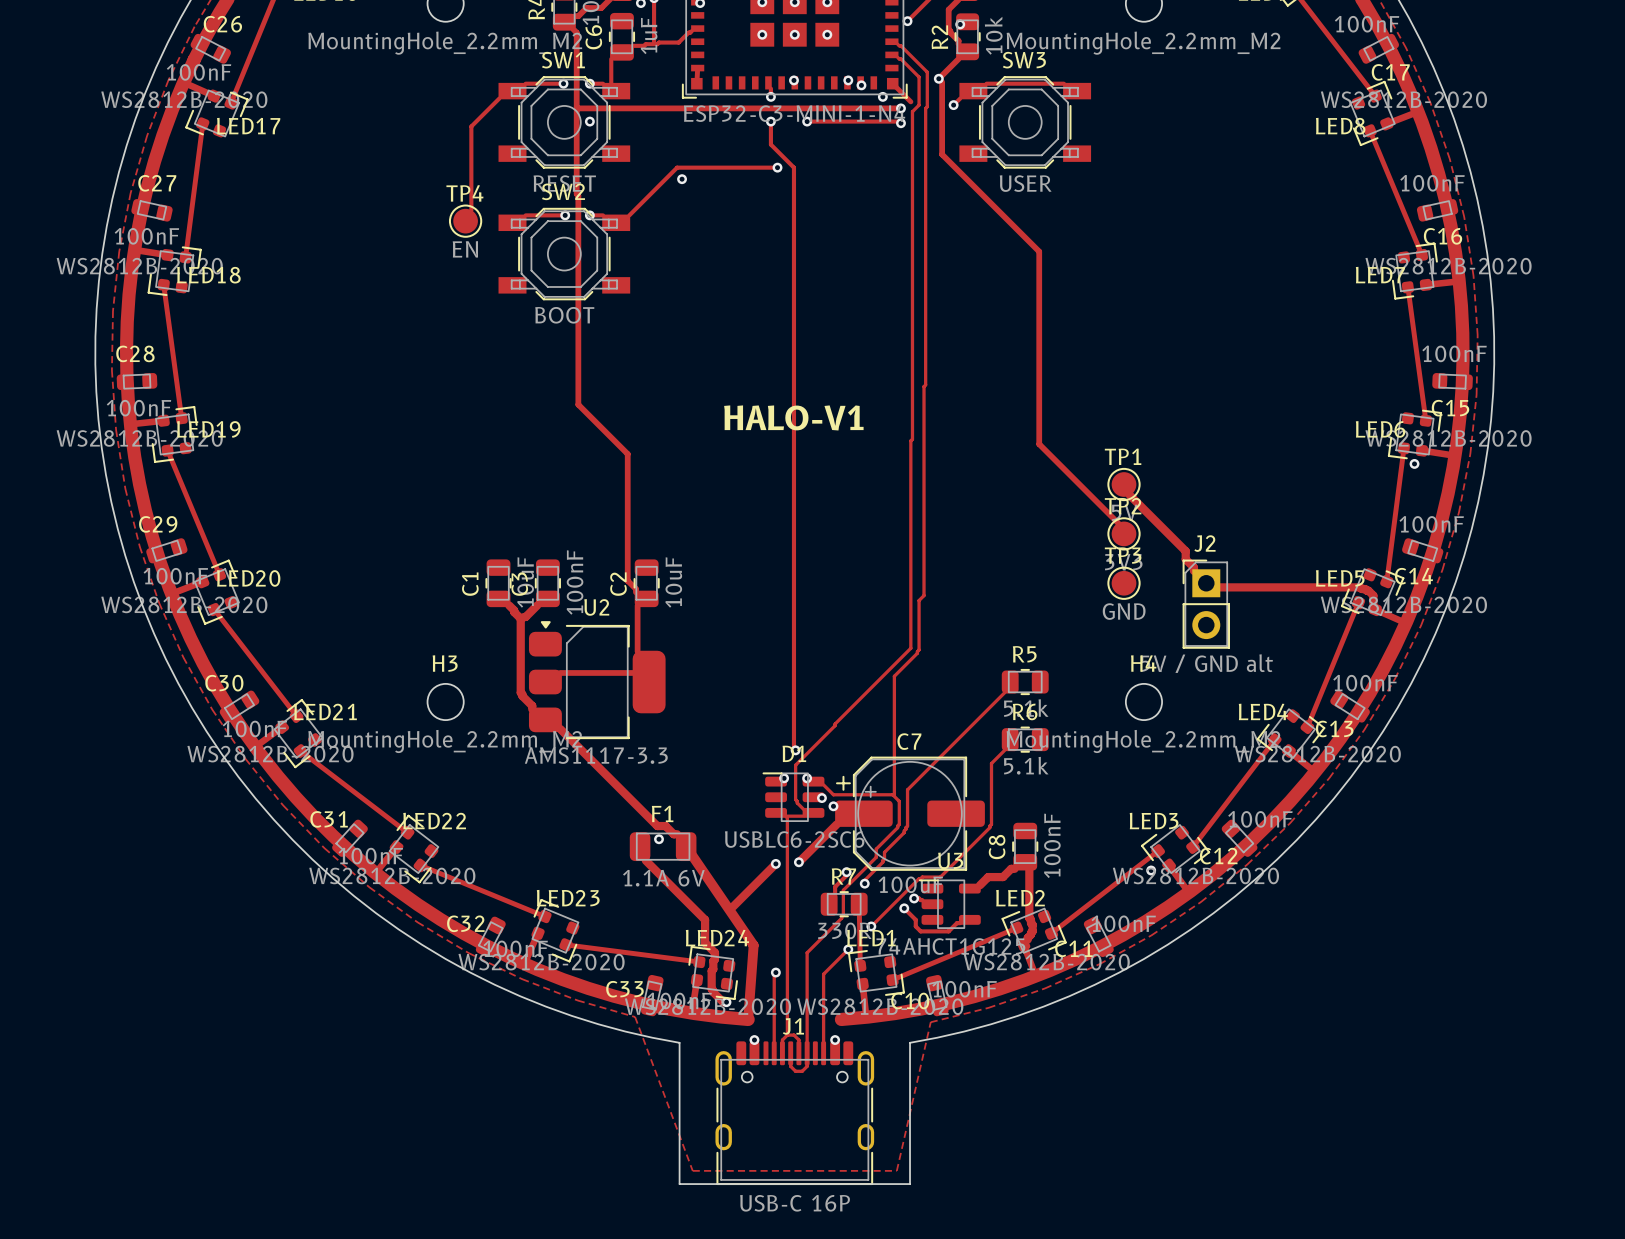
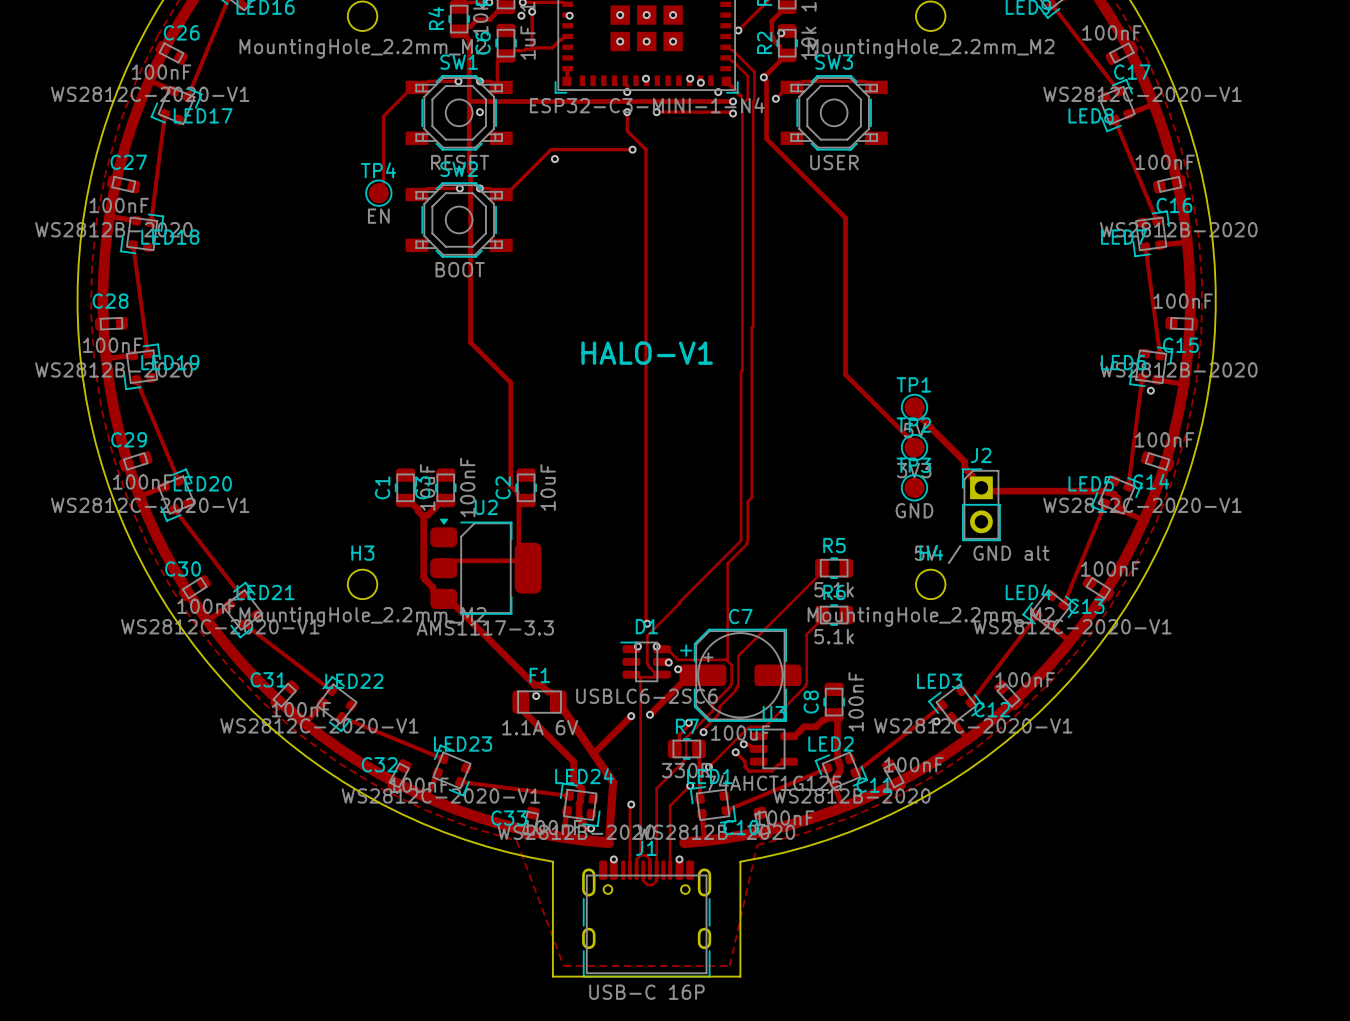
LED17 value: WS2812B-2020 (184, 99) -> WS2812C-2020-V1 (150, 94)
LED8 value: WS2812B-2020 (1403, 99) -> WS2812C-2020-V1 (1142, 94)
LED20 value: WS2812B-2020 (184, 604) -> WS2812C-2020-V1 (150, 505)
LED5 value: WS2812B-2020 (1403, 604) -> WS2812C-2020-V1 (1142, 505)
LED21 value: WS2812B-2020 (270, 754) -> WS2812C-2020-V1 (220, 626)
LED4 value: WS2812B-2020 (1317, 754) -> WS2812C-2020-V1 (1072, 626)
LED22 value: WS2812B-2020 (392, 875) -> WS2812C-2020-V1 (319, 725)
LED3 value: WS2812B-2020 (1195, 875) -> WS2812C-2020-V1 (973, 725)
LED23 value: WS2812B-2020 (541, 962) -> WS2812C-2020-V1 (440, 795)

